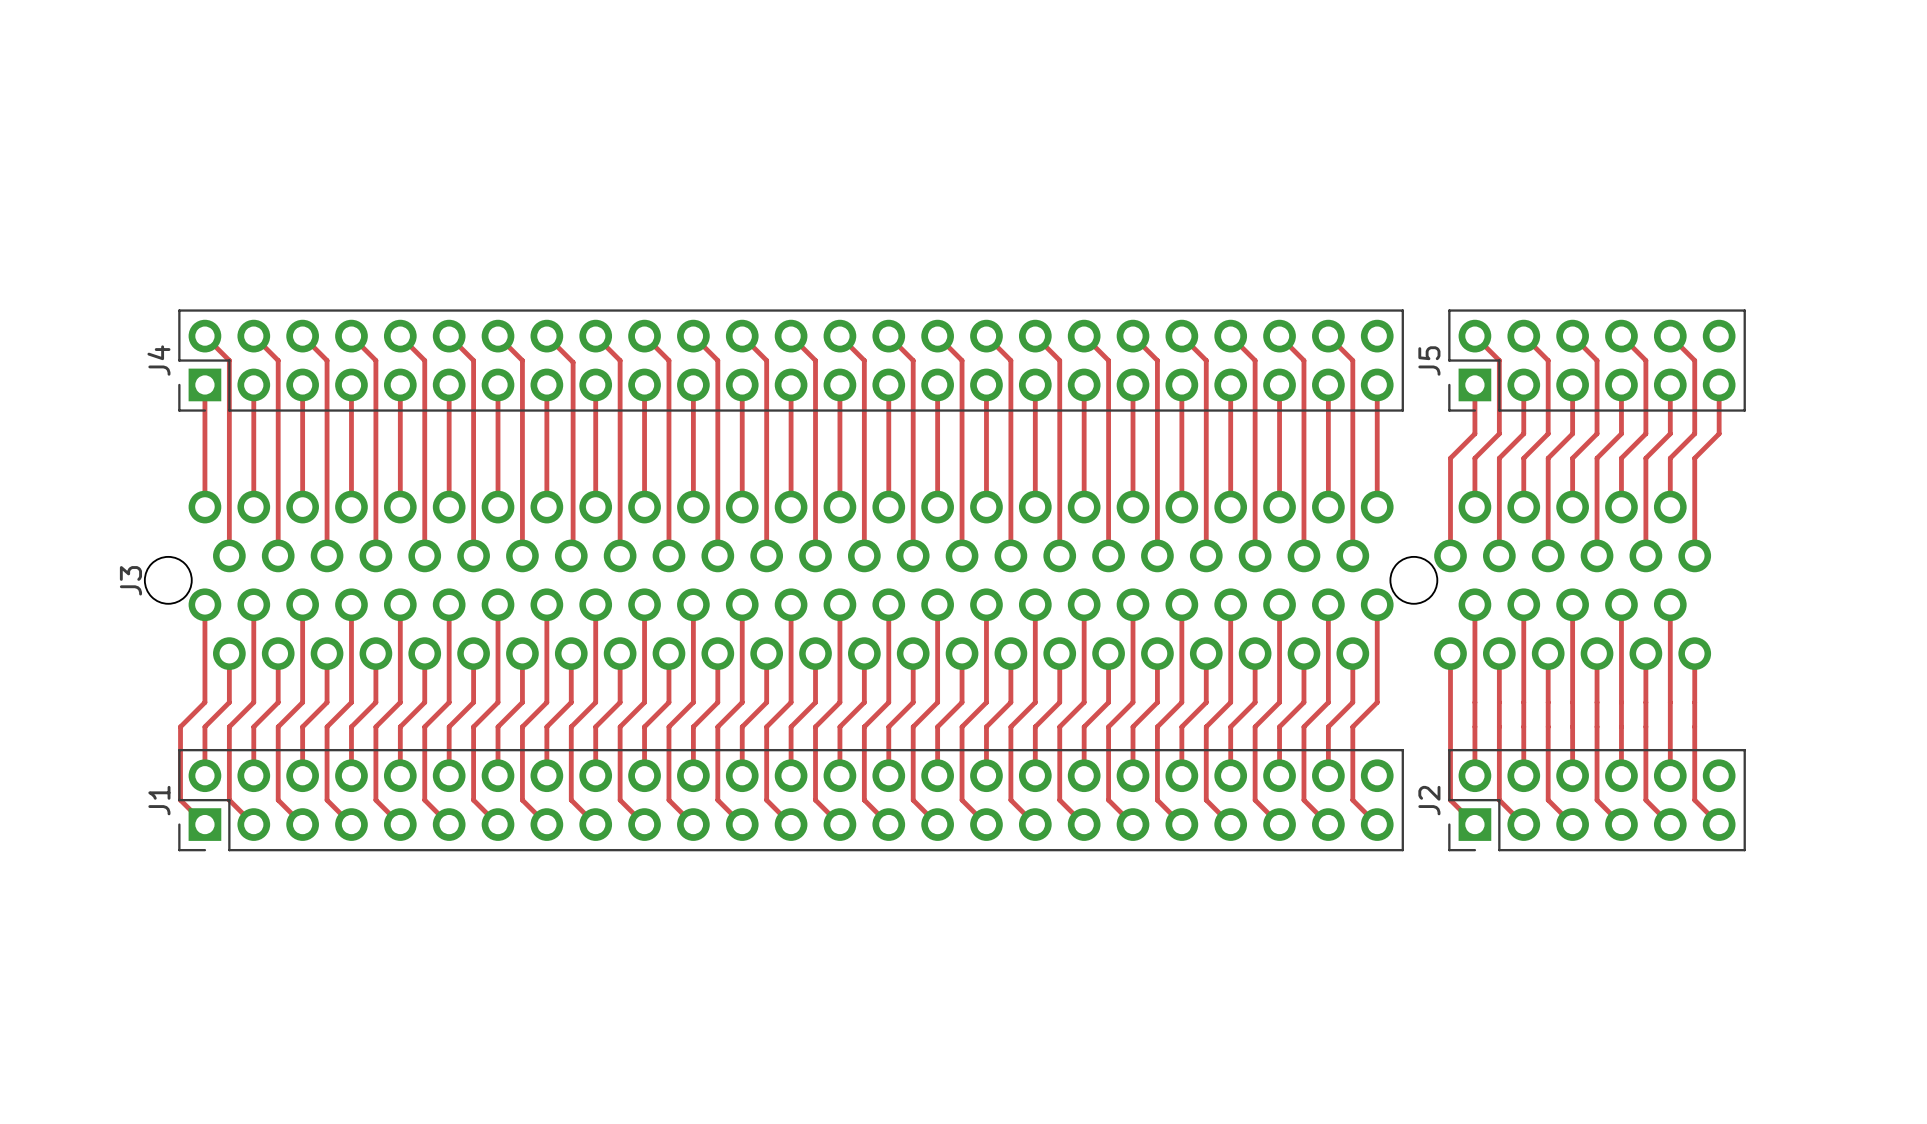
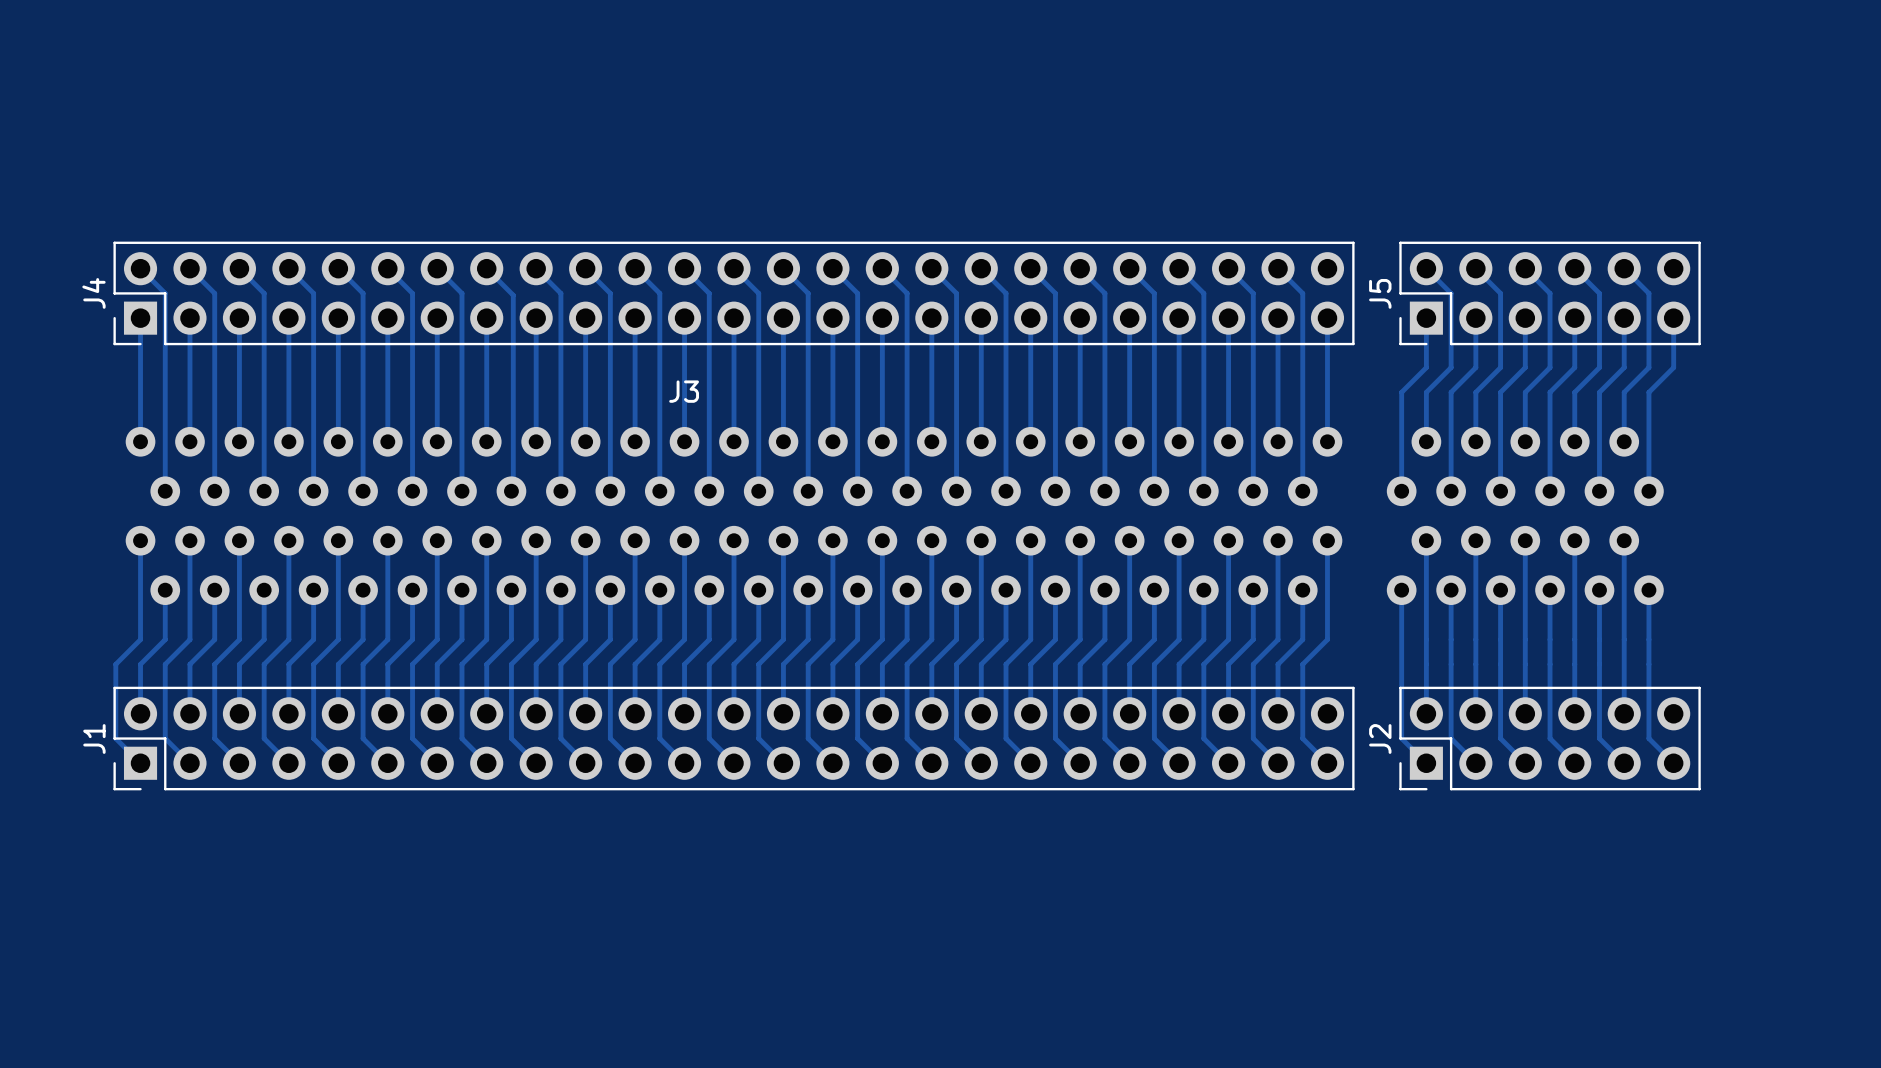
J3 footprint: [144, 490, 1712, 670] -> [125, 426, 1664, 606]
J3 name position: J3 (130, 580) -> J3 (684, 391)

